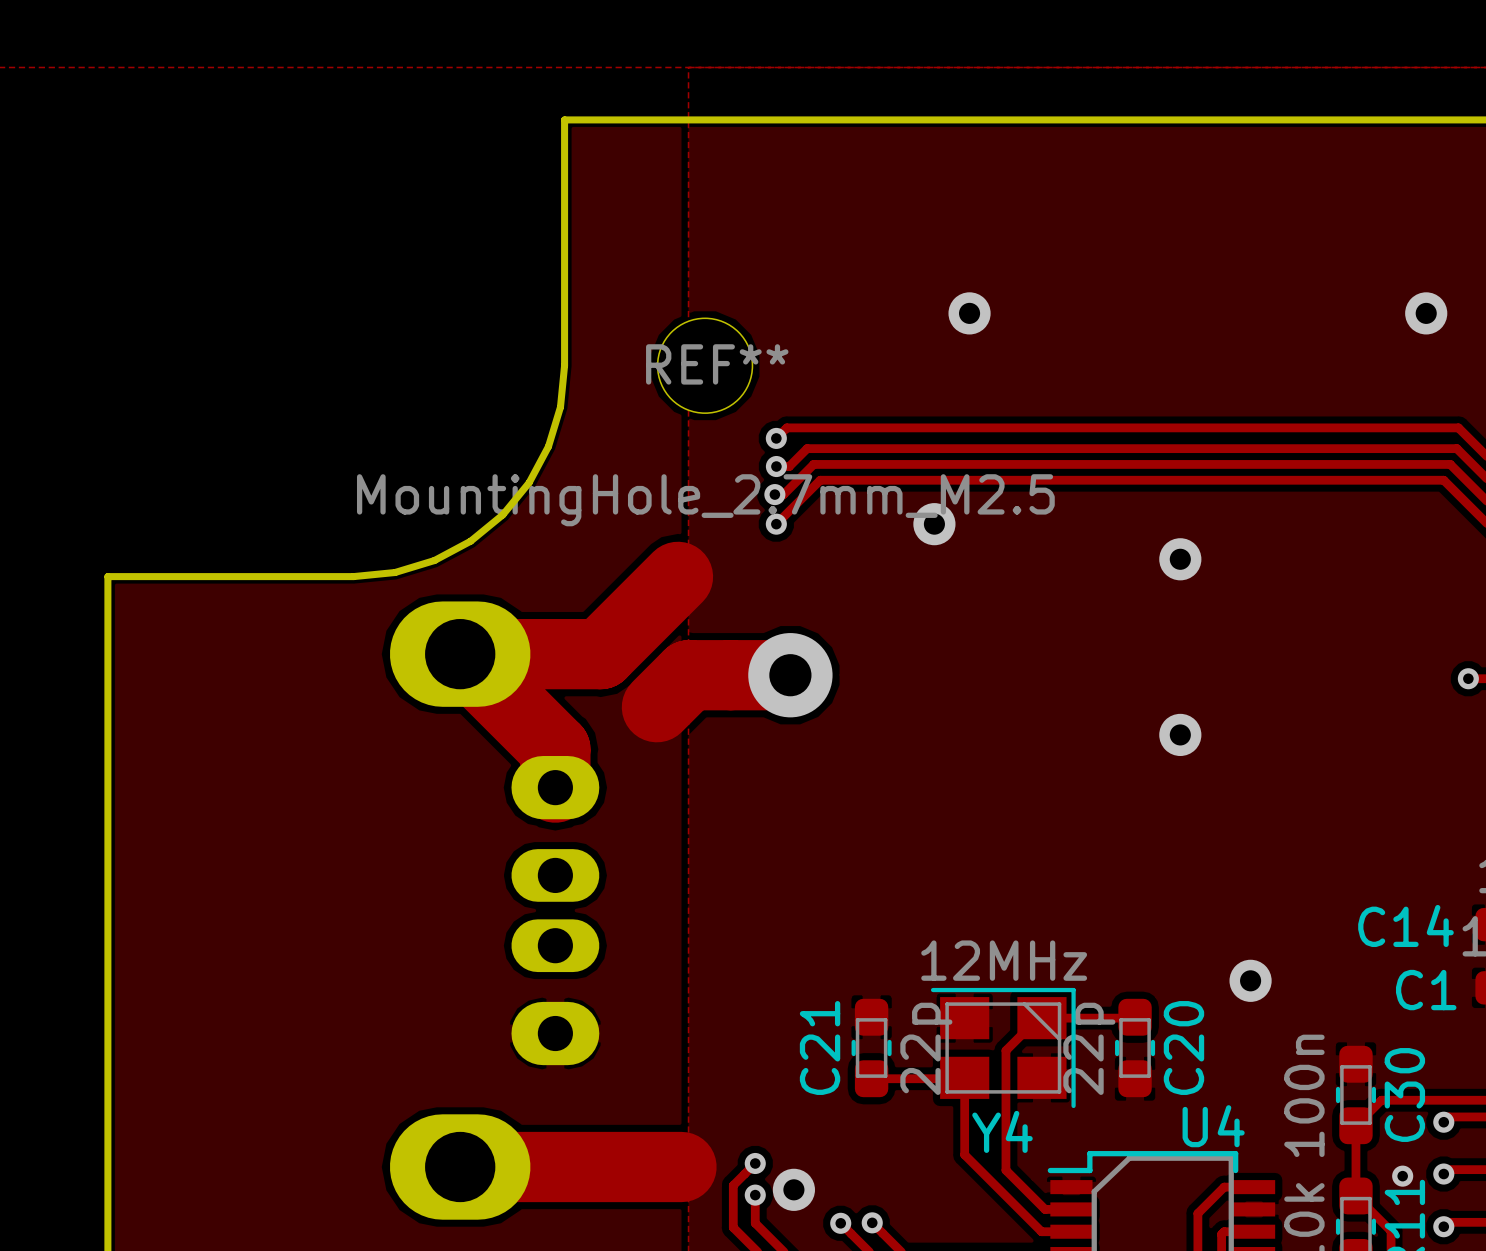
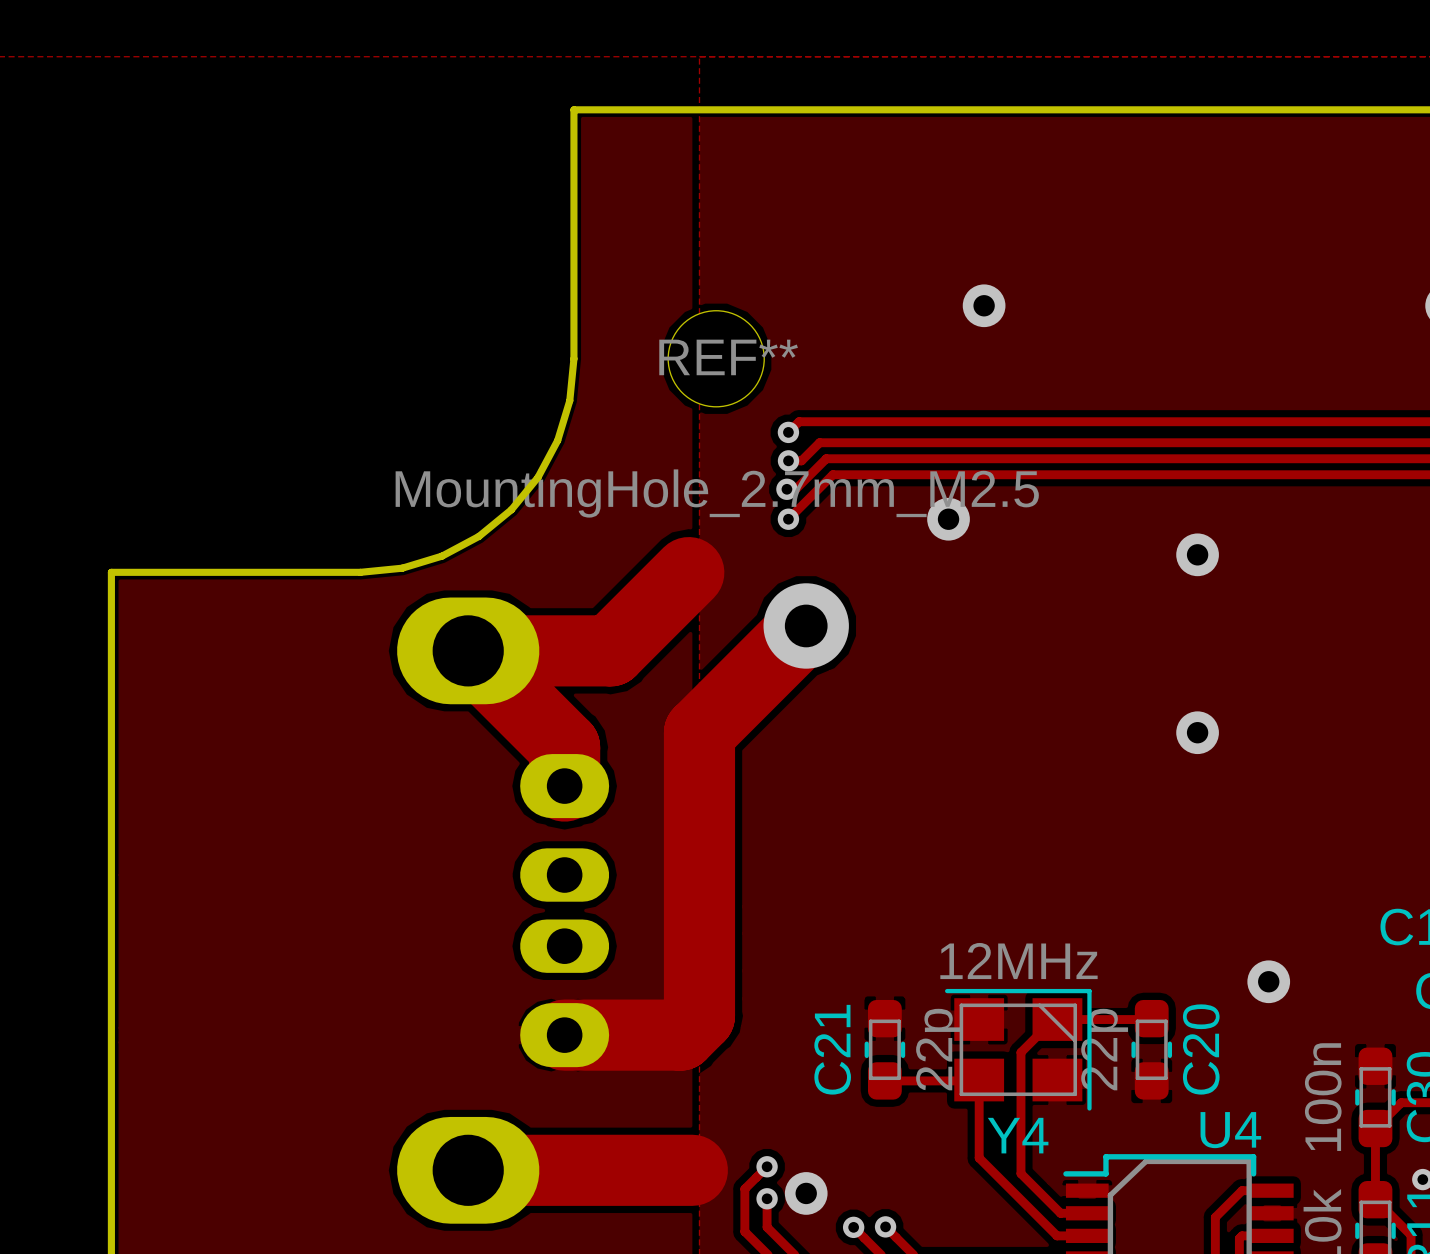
track: none -> (806, 625) (699, 732) (699, 1015) (680, 1035) (564, 1035)
track: (790, 675) (688, 675) (656, 707) -> none
via position: (790, 675) -> (806, 625)

